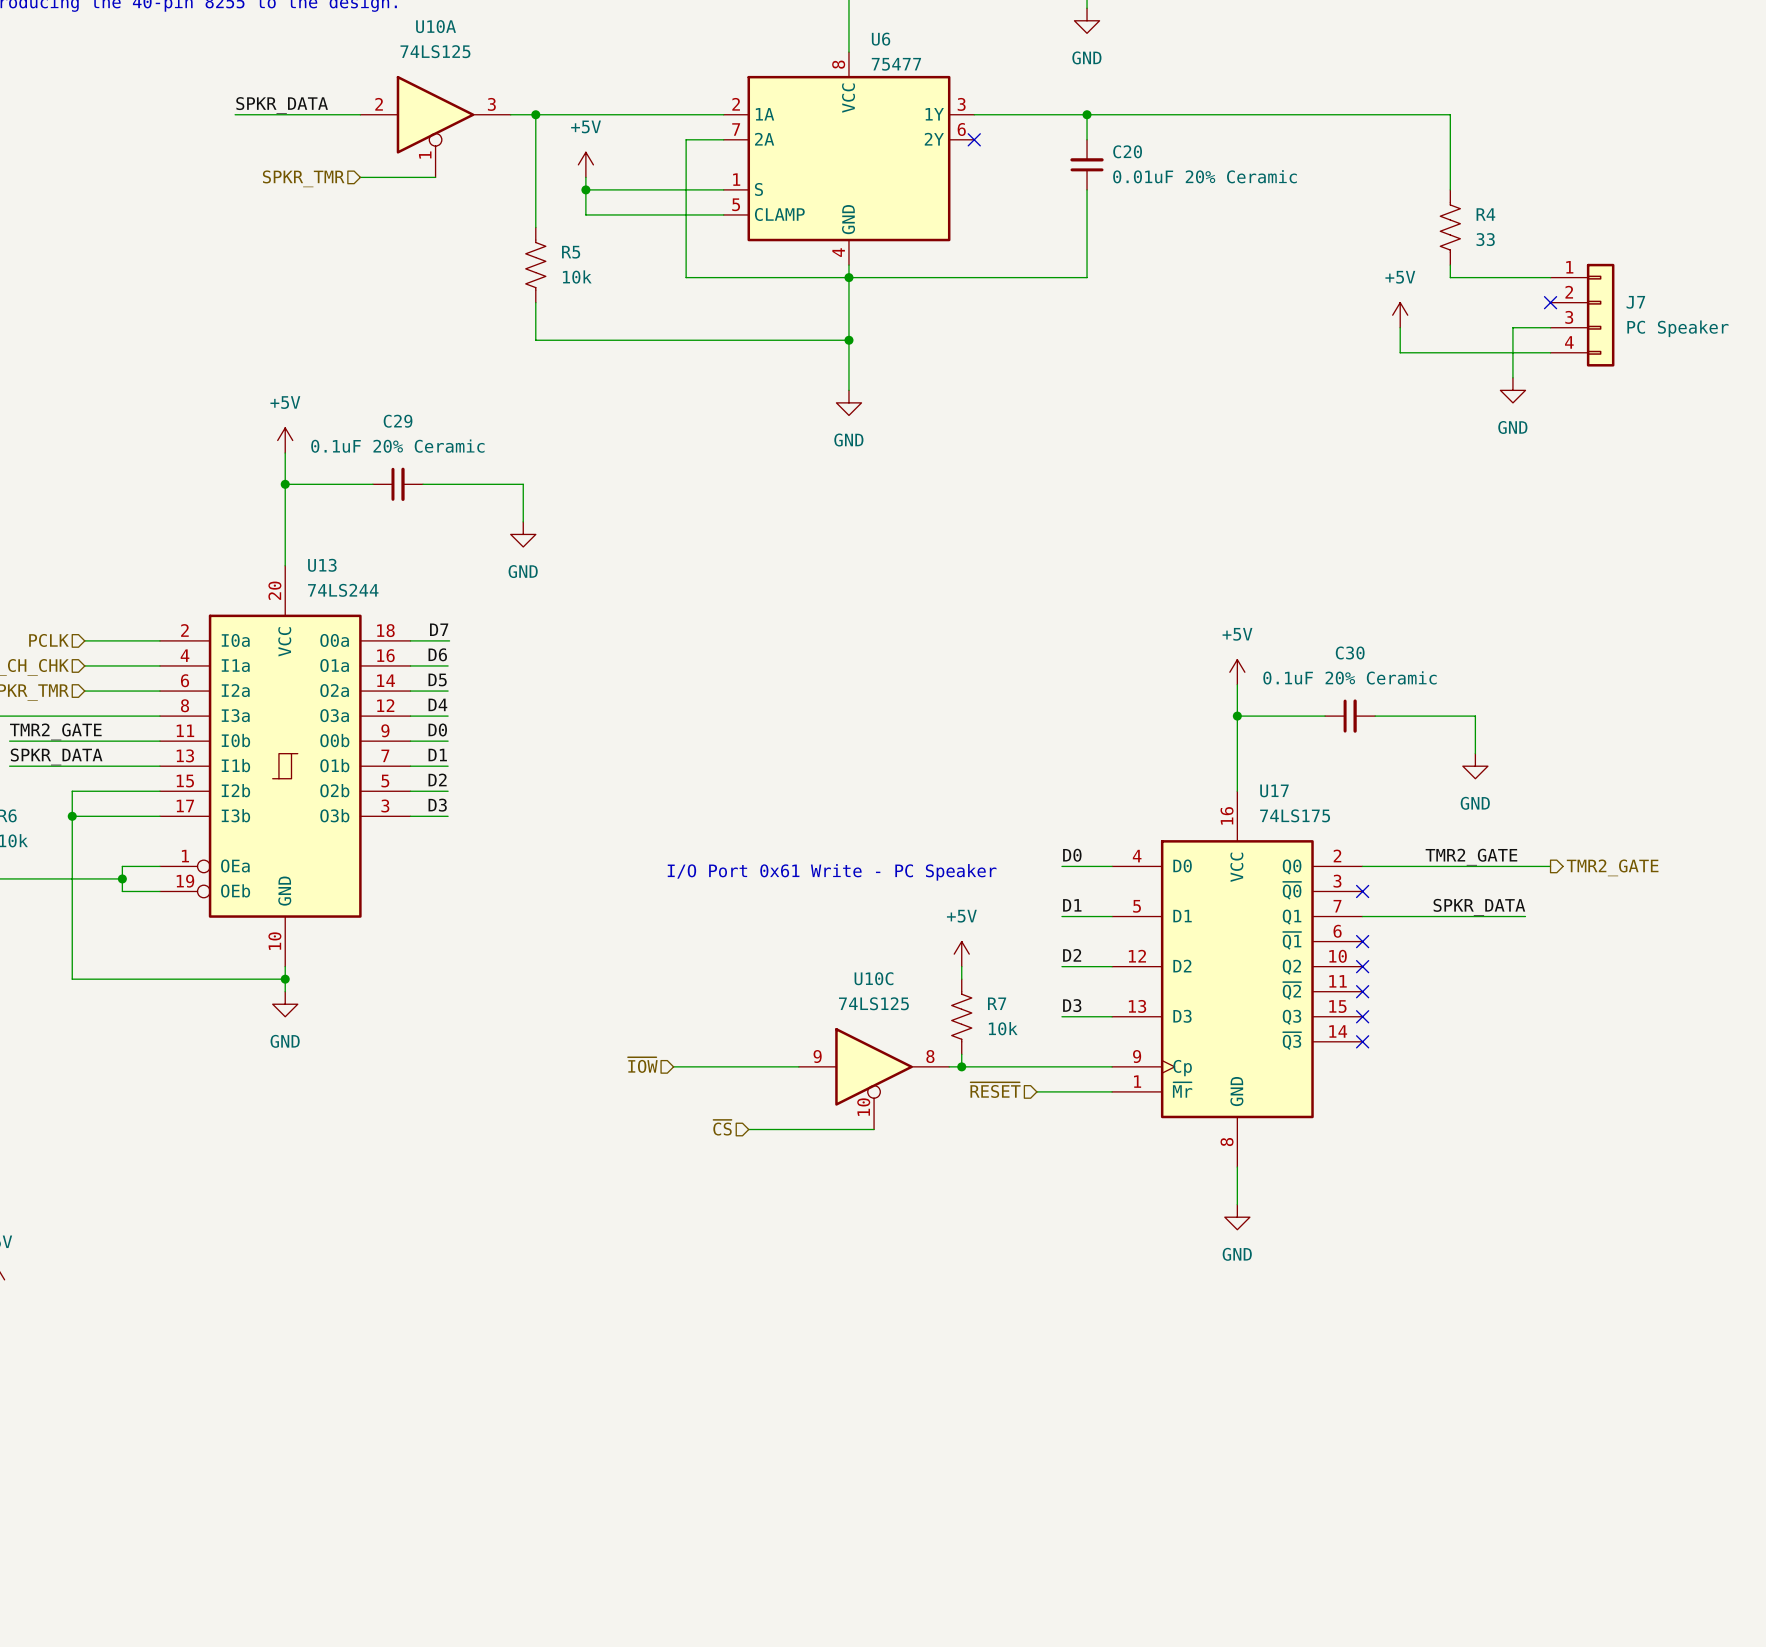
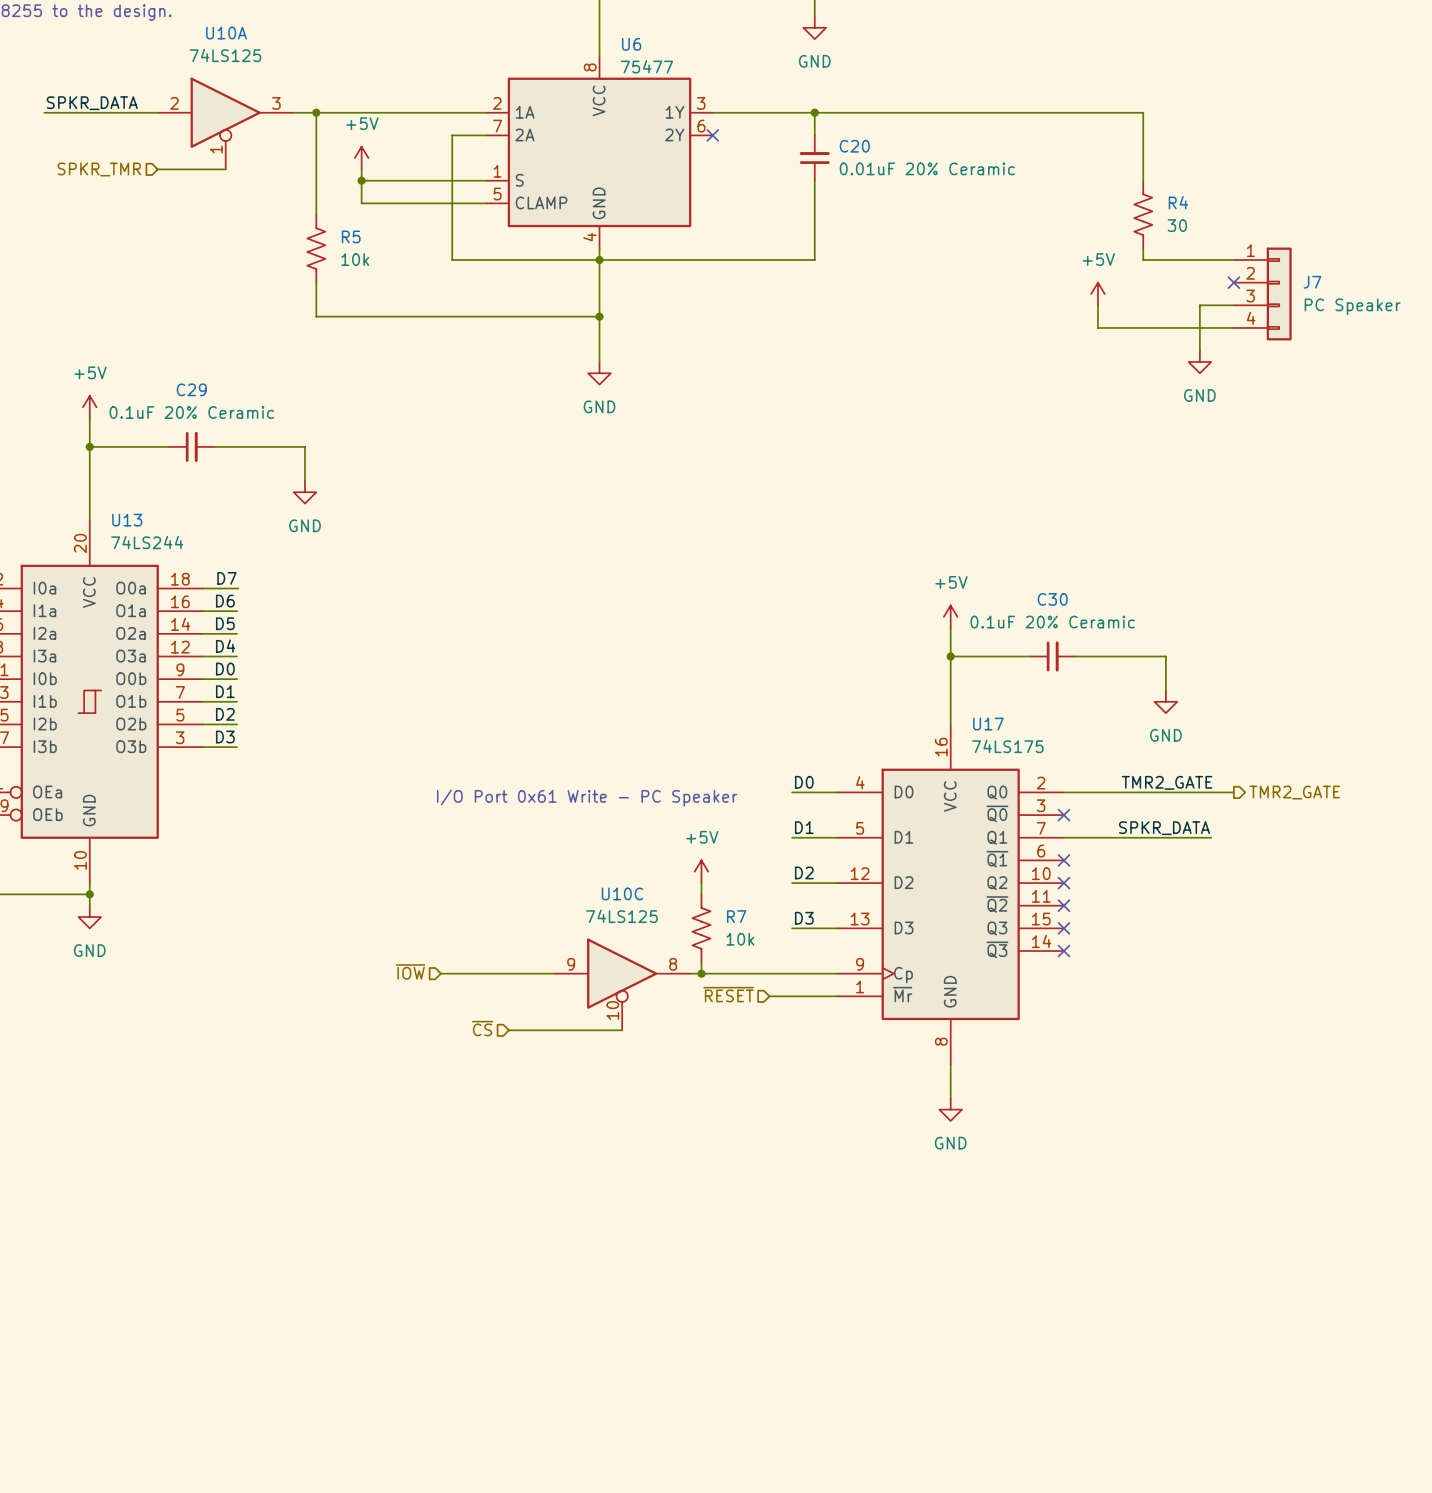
R4 value: 33 (1485, 239) -> 30 (1177, 225)

